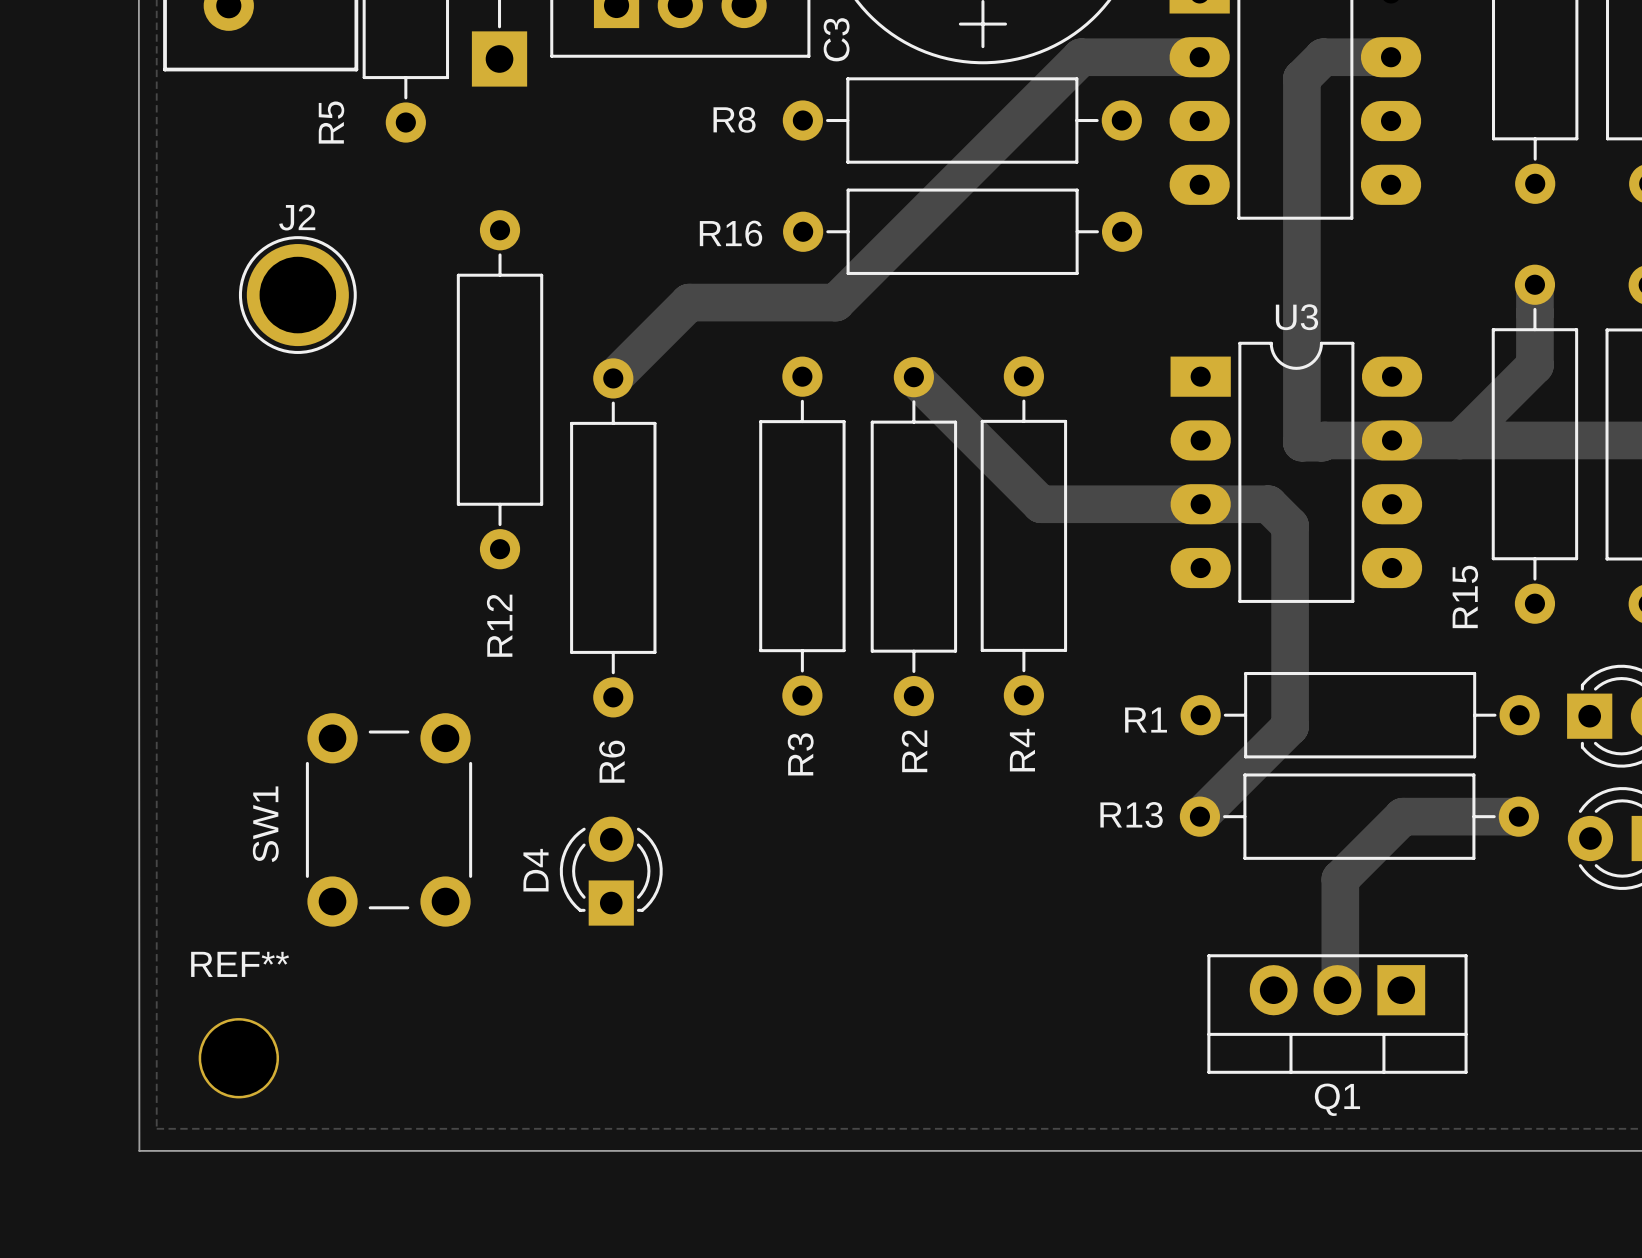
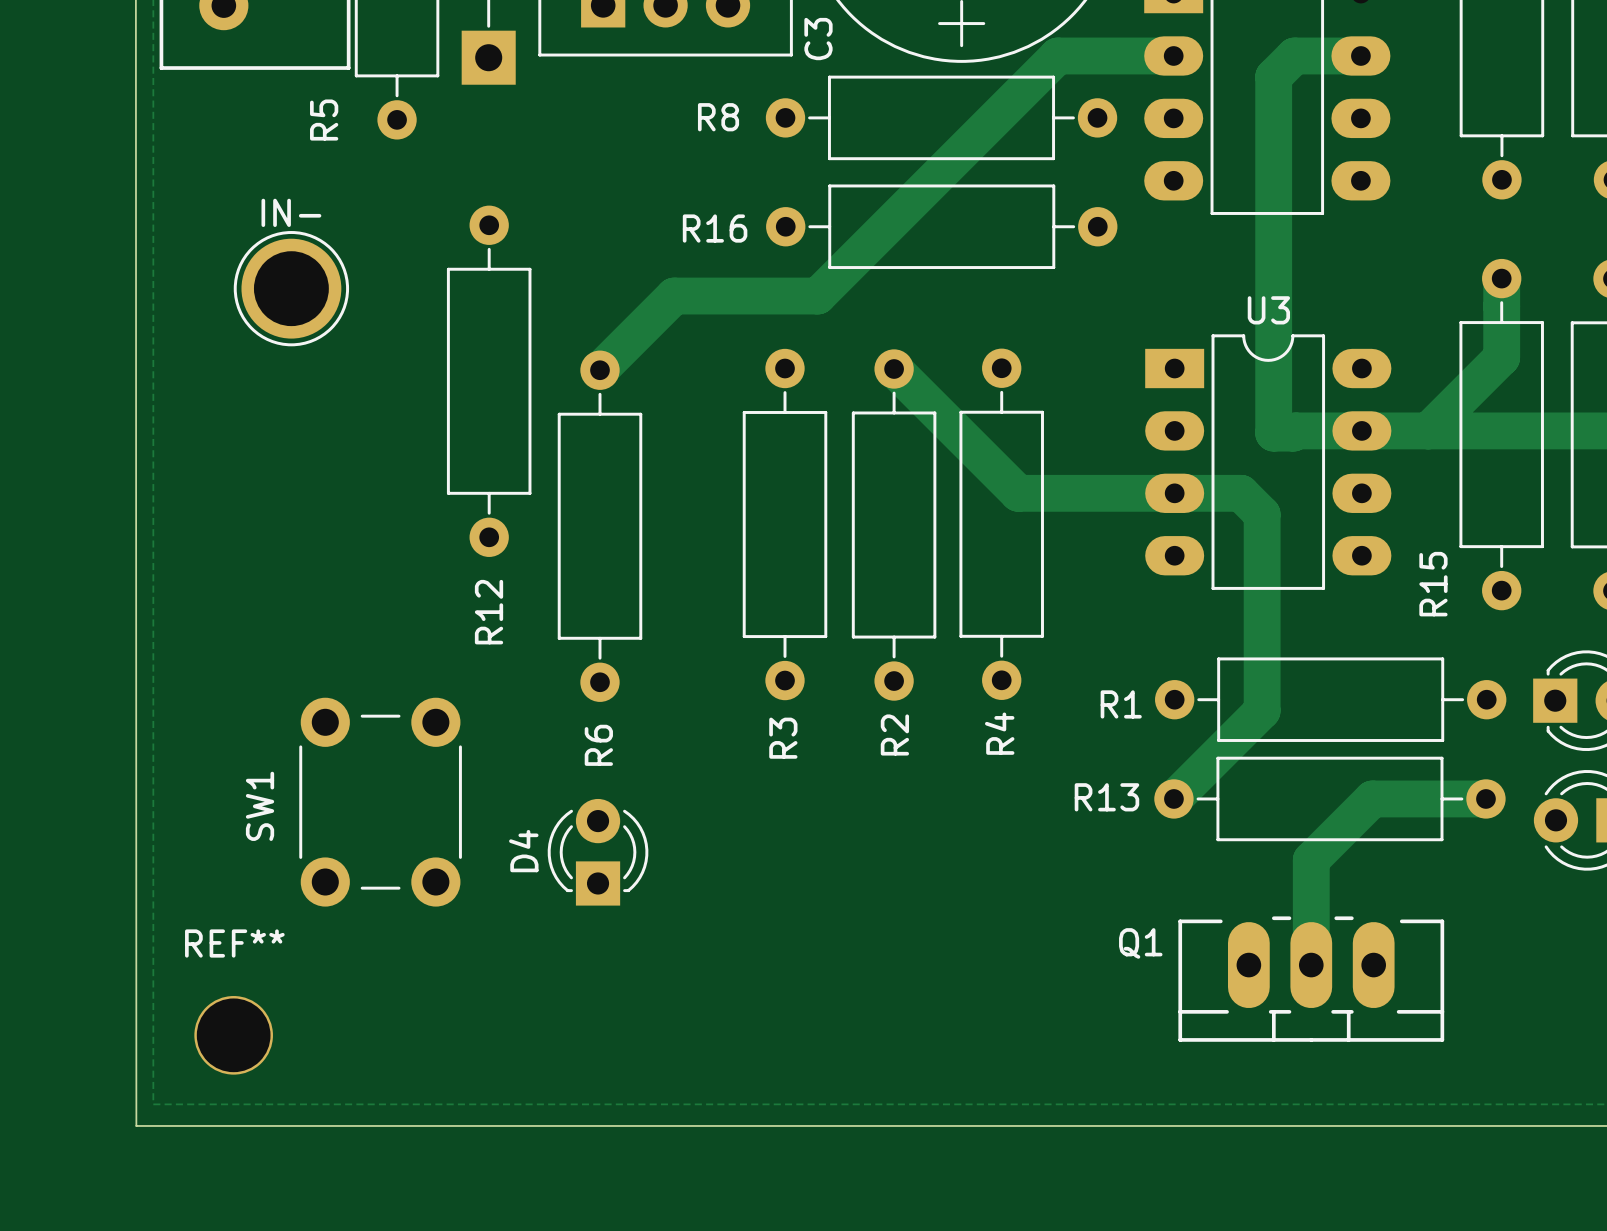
J2 name: J2 (297, 217) -> IN- (291, 212)
Q1 footprint: [1207, 954, 1468, 1074] -> [1178, 916, 1445, 1042]
Q1 name position: Q1 (1337, 1099) -> Q1 (1140, 943)

